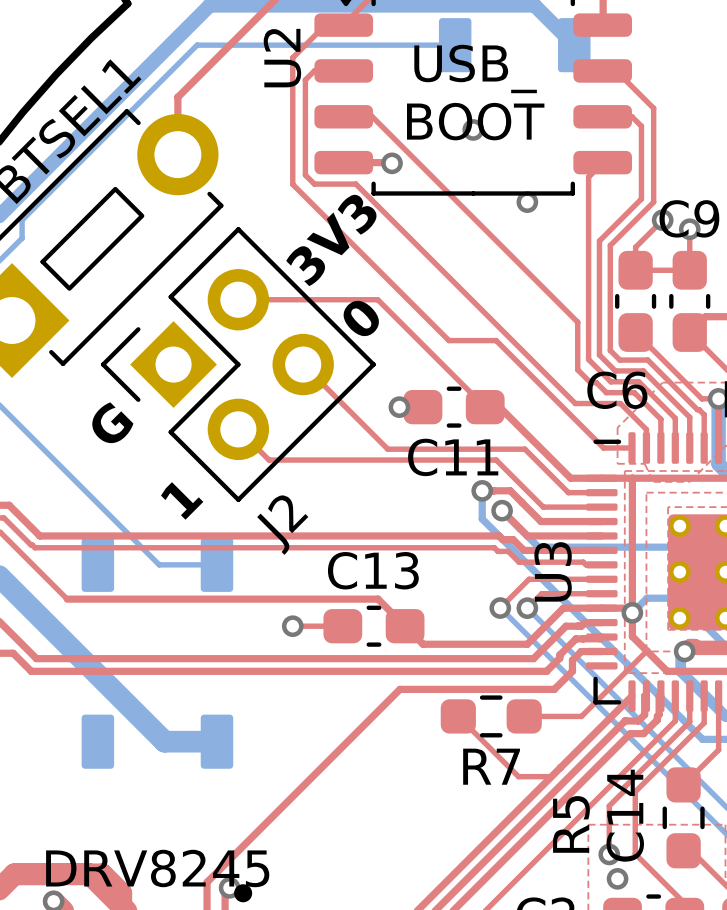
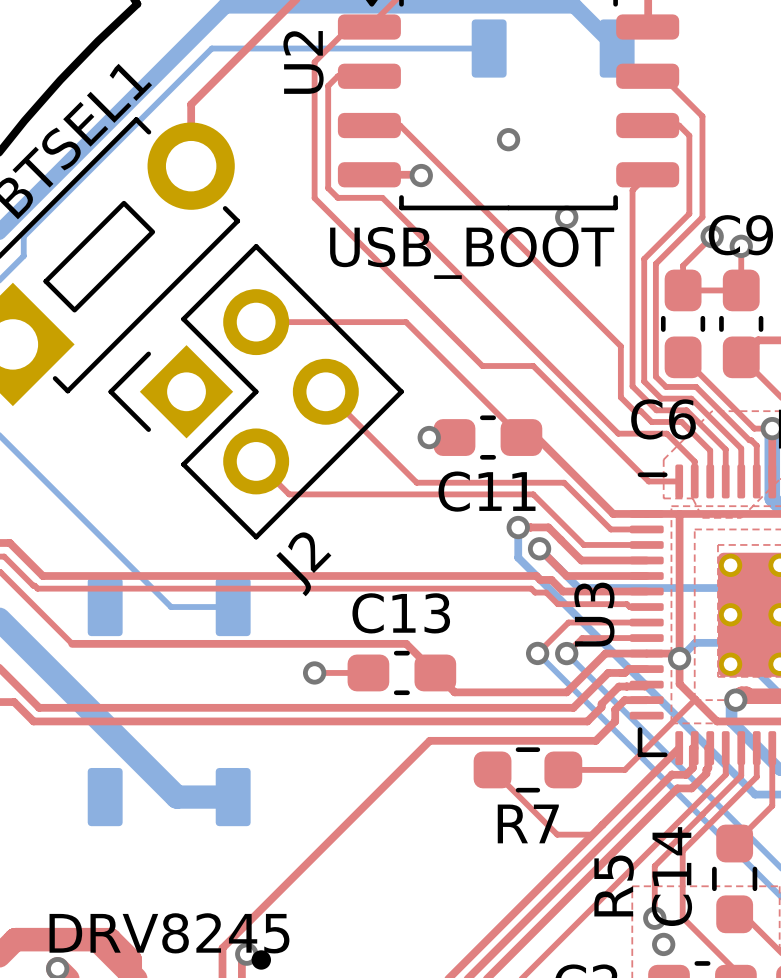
text: USB_ (475, 68) -> none
text: BOOT (475, 121) -> none
text: none -> USB_BOOT (472, 252)
text: 3V3 (331, 240) -> none
text: 0 (361, 318) -> none
text: G (112, 422) -> none
text: 1 (182, 500) -> none

